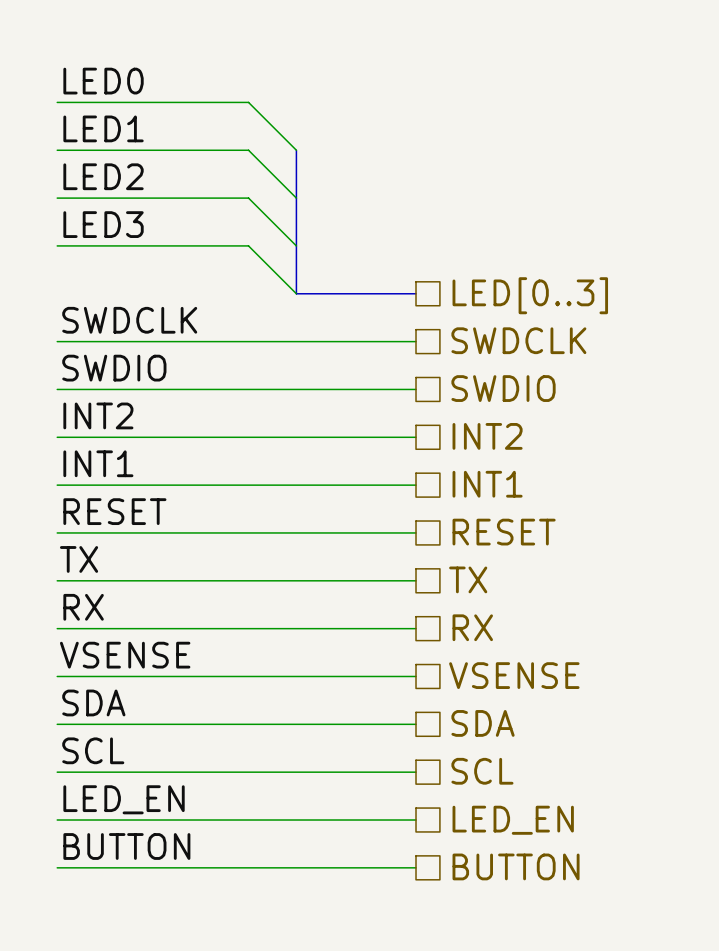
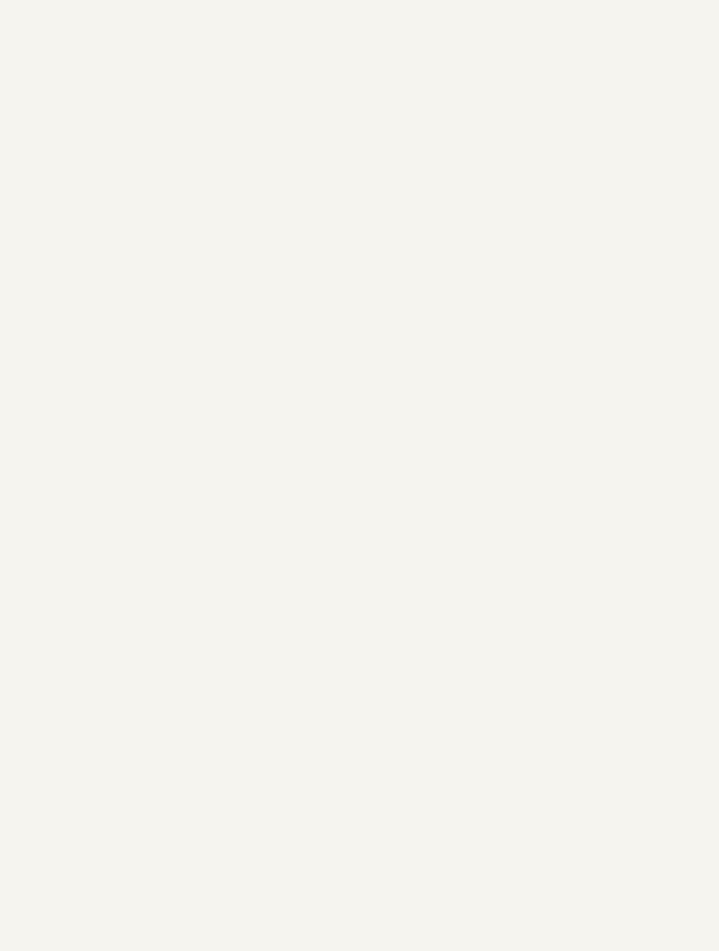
label: LED0 (103, 81) -> none
wire: (57, 102) (248, 102) (296, 150) -> none
label: LED1 (103, 128) -> none
wire: (57, 150) (248, 150) (296, 198) -> none
bus: (296, 150) (296, 293) (416, 293) -> none
label: LED2 (103, 176) -> none
wire: (57, 198) (248, 198) (296, 245) -> none
label: LED3 (103, 224) -> none
wire: (57, 245) (248, 245) (296, 293) -> none
hierarchical label: LED[0..3] (530, 295) -> none
label: SWDCLK (129, 320) -> none
hierarchical label: SWDCLK (518, 340) -> none
wire: (57, 341) (416, 341) -> none
label: SWDIO (114, 368) -> none
hierarchical label: SWDIO (503, 388) -> none
wire: (57, 389) (416, 389) -> none
label: INT2 (98, 415) -> none
hierarchical label: INT2 (487, 436) -> none
wire: (57, 437) (416, 437) -> none
label: INT1 (98, 463) -> none
hierarchical label: INT1 (487, 484) -> none
wire: (57, 485) (416, 485) -> none
label: RESET (114, 511) -> none
wire: (57, 532) (416, 532) -> none
hierarchical label: RESET (504, 532) -> none
label: TX (79, 559) -> none
hierarchical label: TX (468, 579) -> none
wire: (57, 580) (416, 580) -> none
label: RX (83, 607) -> none
hierarchical label: RX (472, 627) -> none
wire: (57, 628) (416, 628) -> none
label: VSENSE (125, 655) -> none
hierarchical label: VSENSE (514, 675) -> none
wire: (57, 676) (416, 676) -> none
label: SDA (93, 702) -> none
hierarchical label: SDA (483, 723) -> none
wire: (57, 724) (416, 724) -> none
label: SCL (93, 750) -> none
hierarchical label: SCL (482, 771) -> none
wire: (57, 772) (416, 772) -> none
label: LED_EN (124, 799) -> none
wire: (57, 820) (416, 820) -> none
hierarchical label: LED_EN (513, 820) -> none
label: BUTTON (126, 846) -> none
hierarchical label: BUTTON (516, 866) -> none
wire: (57, 867) (416, 867) -> none

